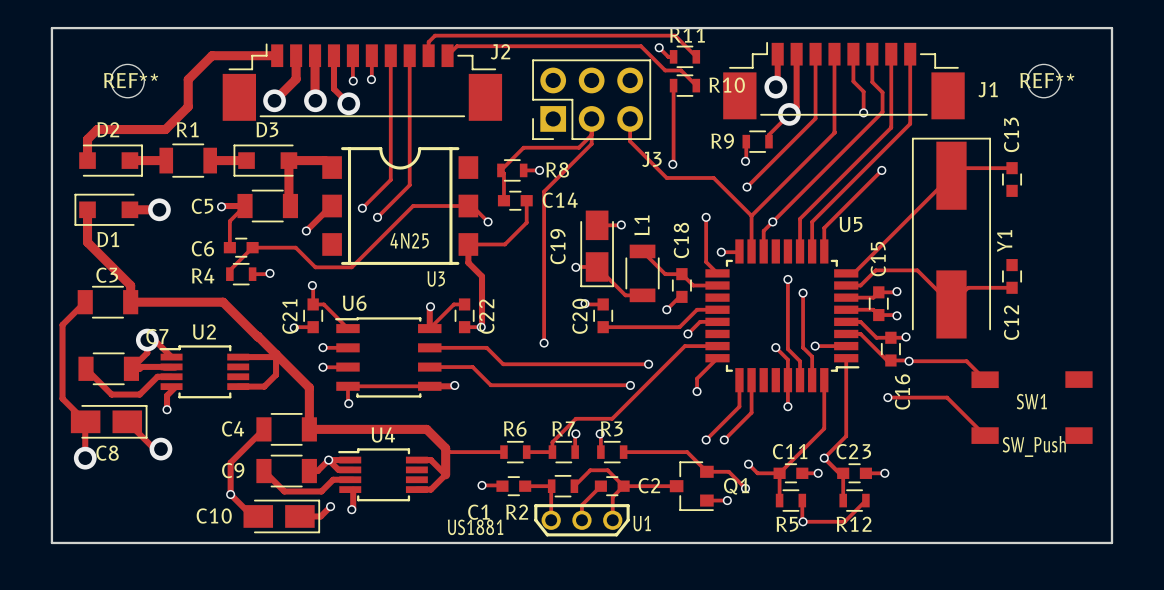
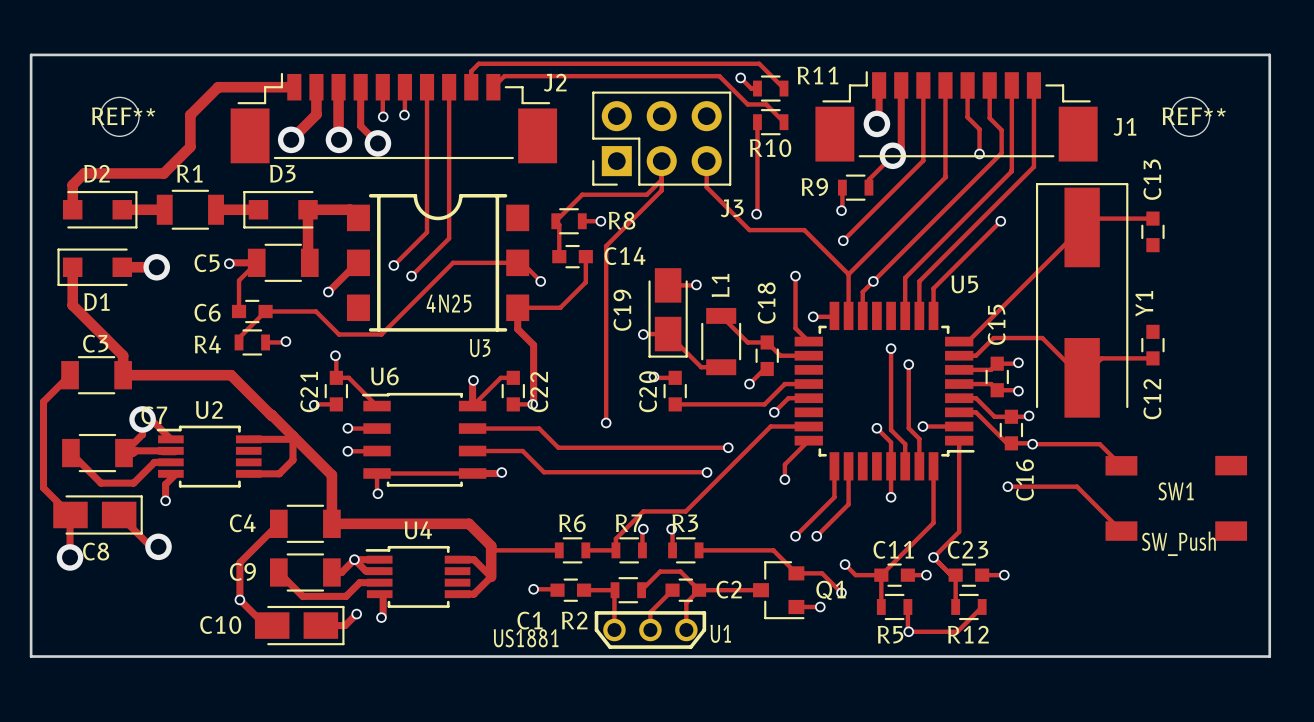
R11 name position: R11 (687, 35) -> R11 (817, 75)
R10 name position: R10 (727, 85) -> R10 (770, 148)

